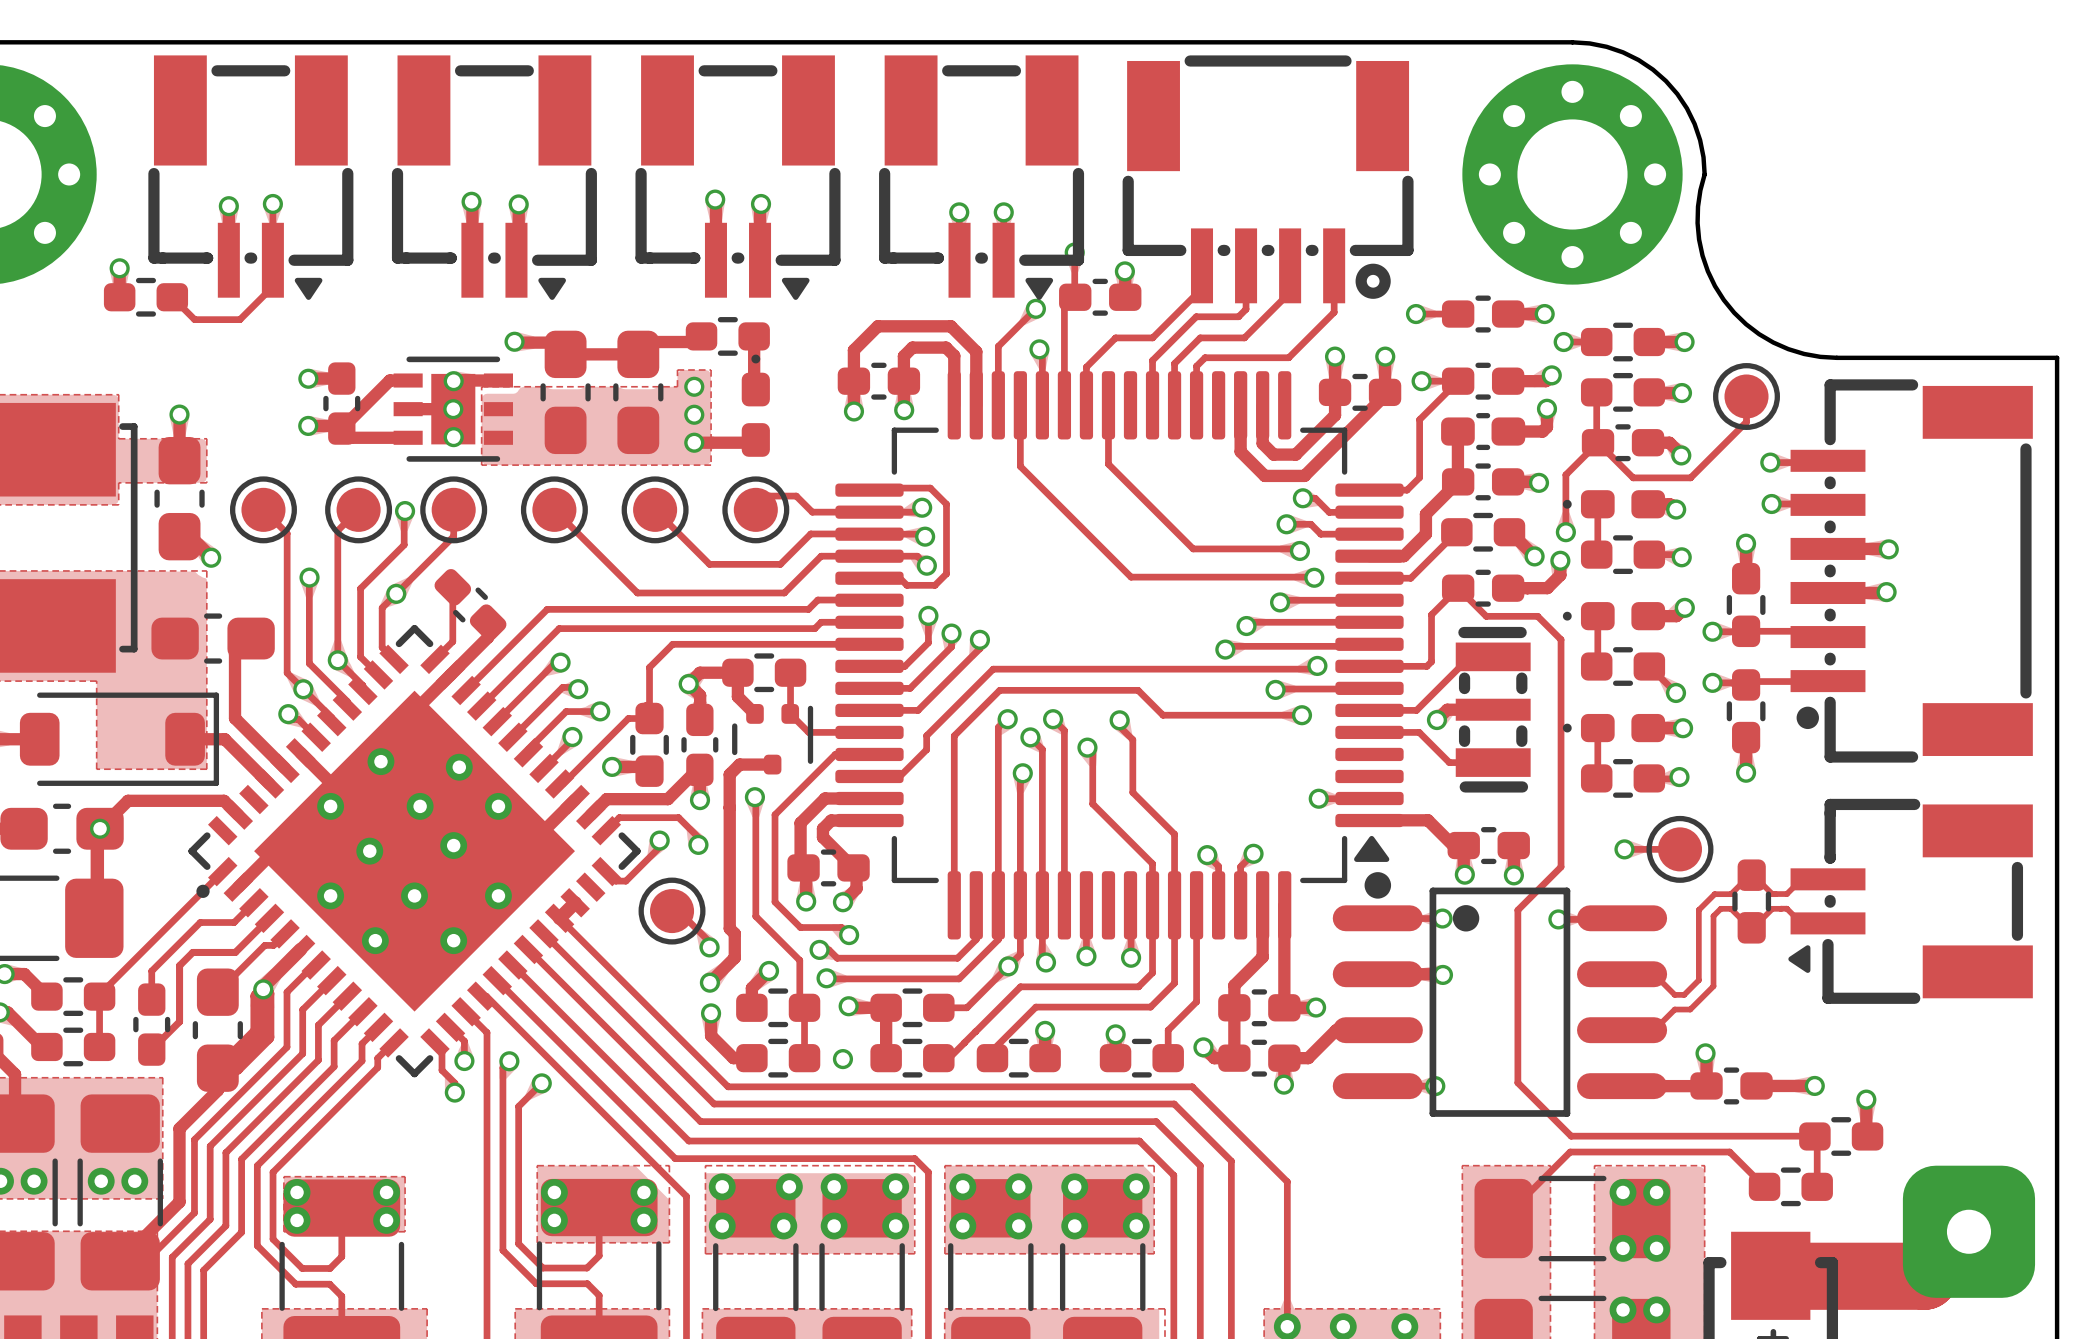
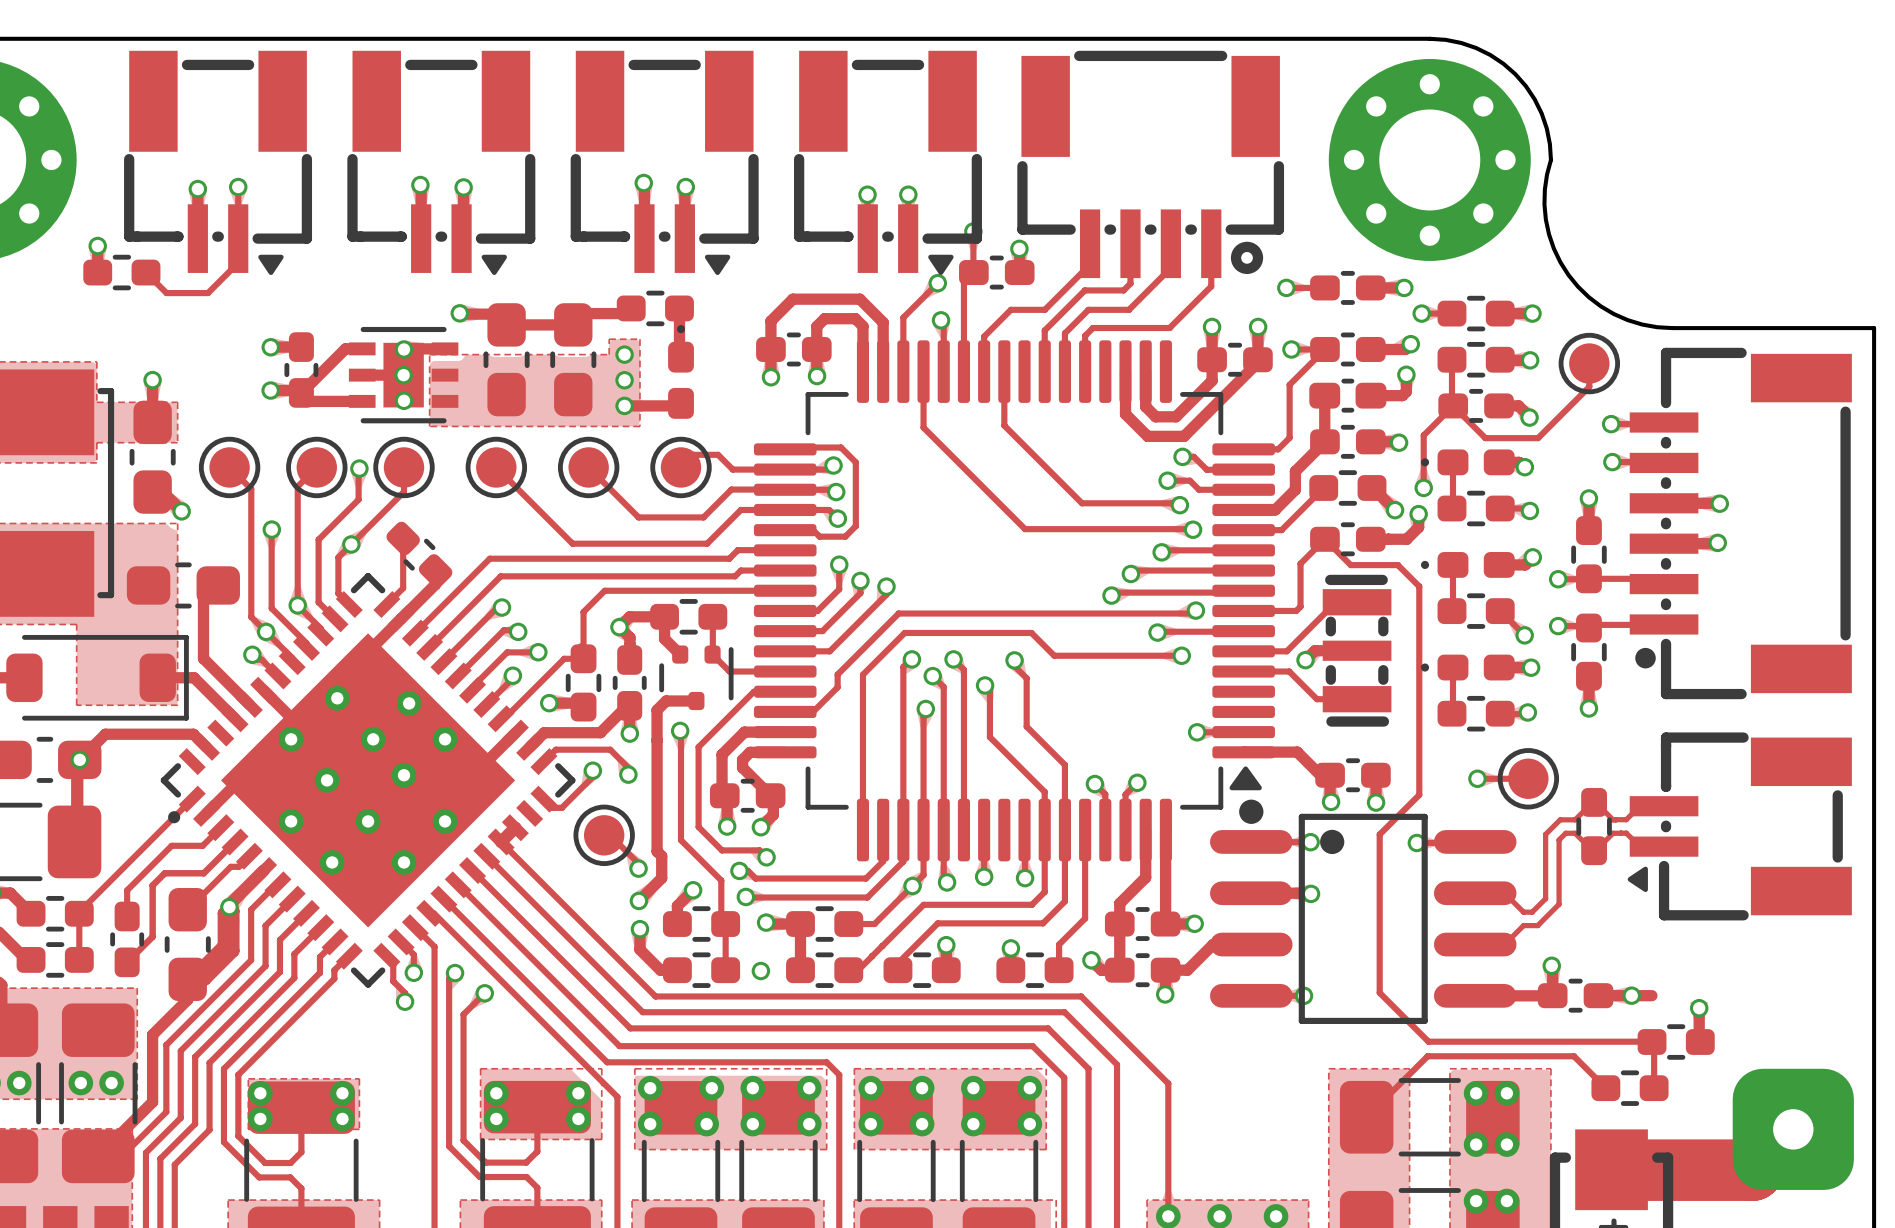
via position: (1814, 1085) -> (1631, 995)

